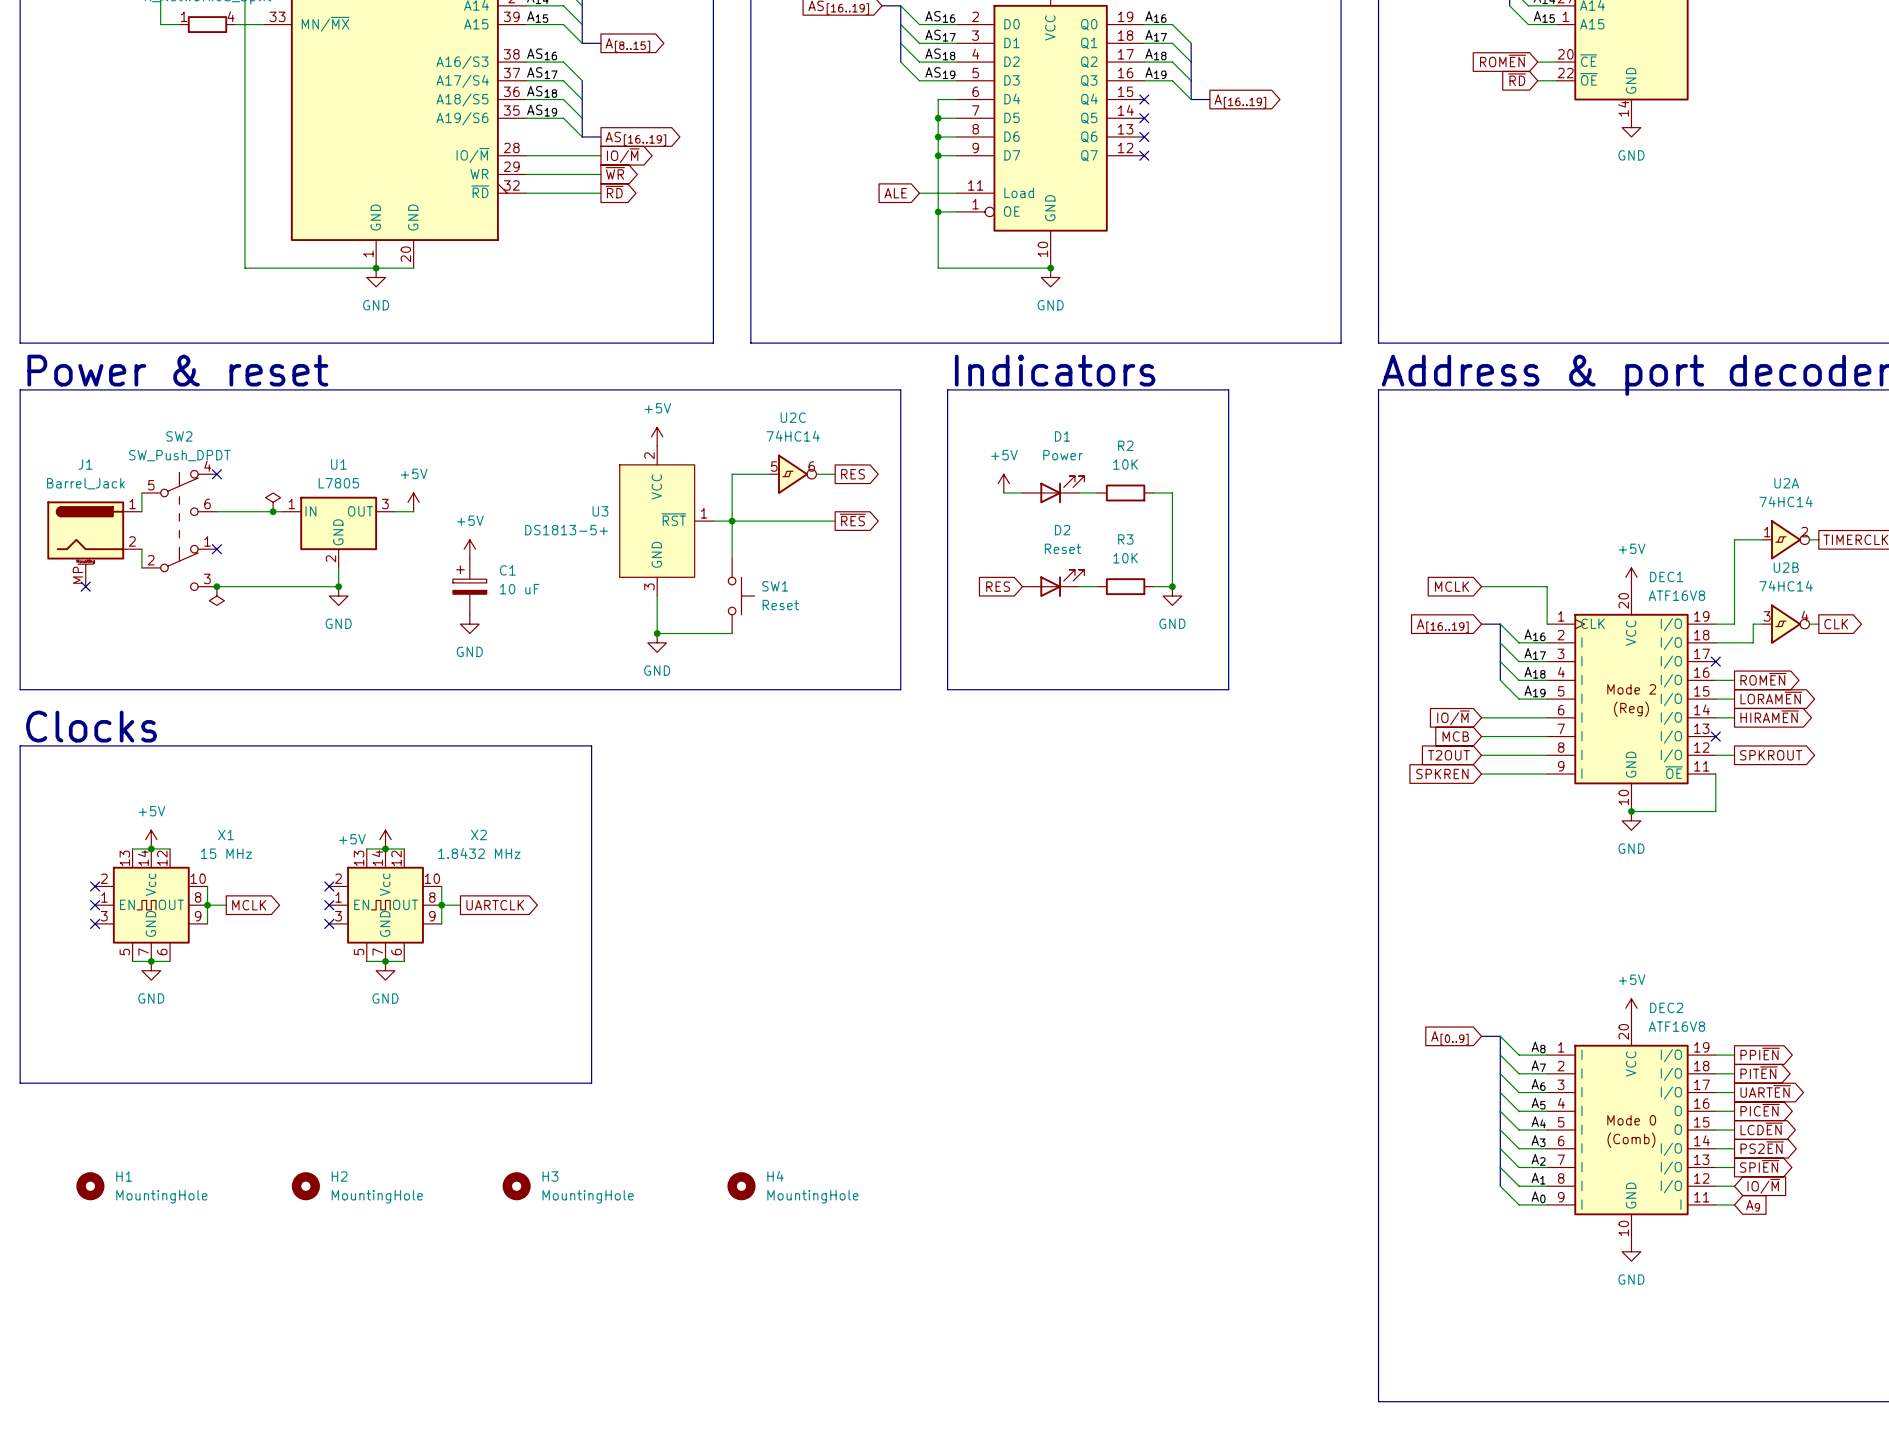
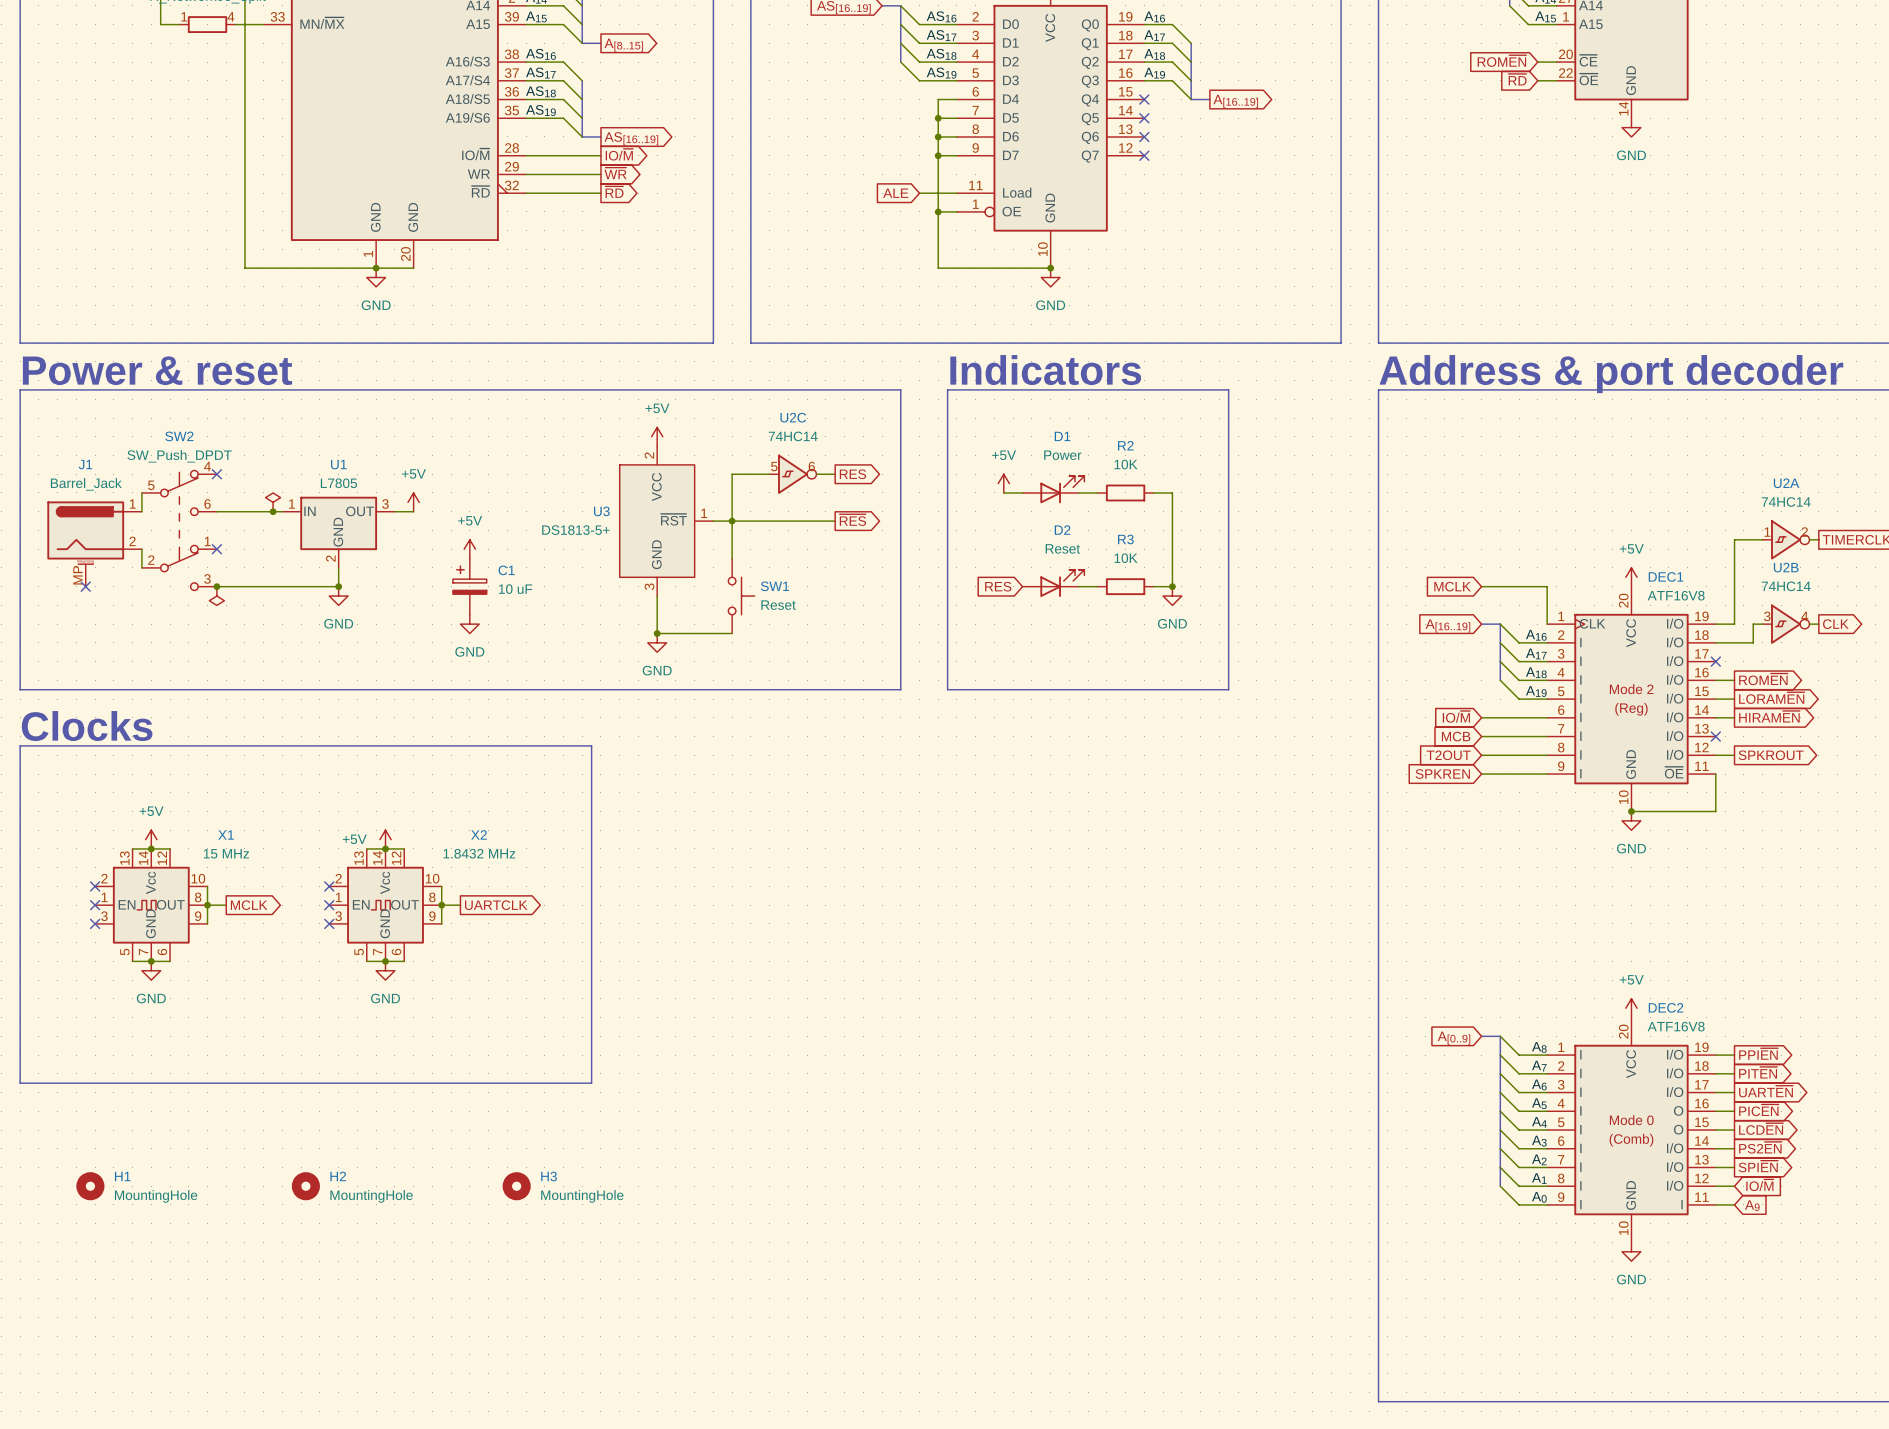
H4: MountingHole (741, 1186) -> none

